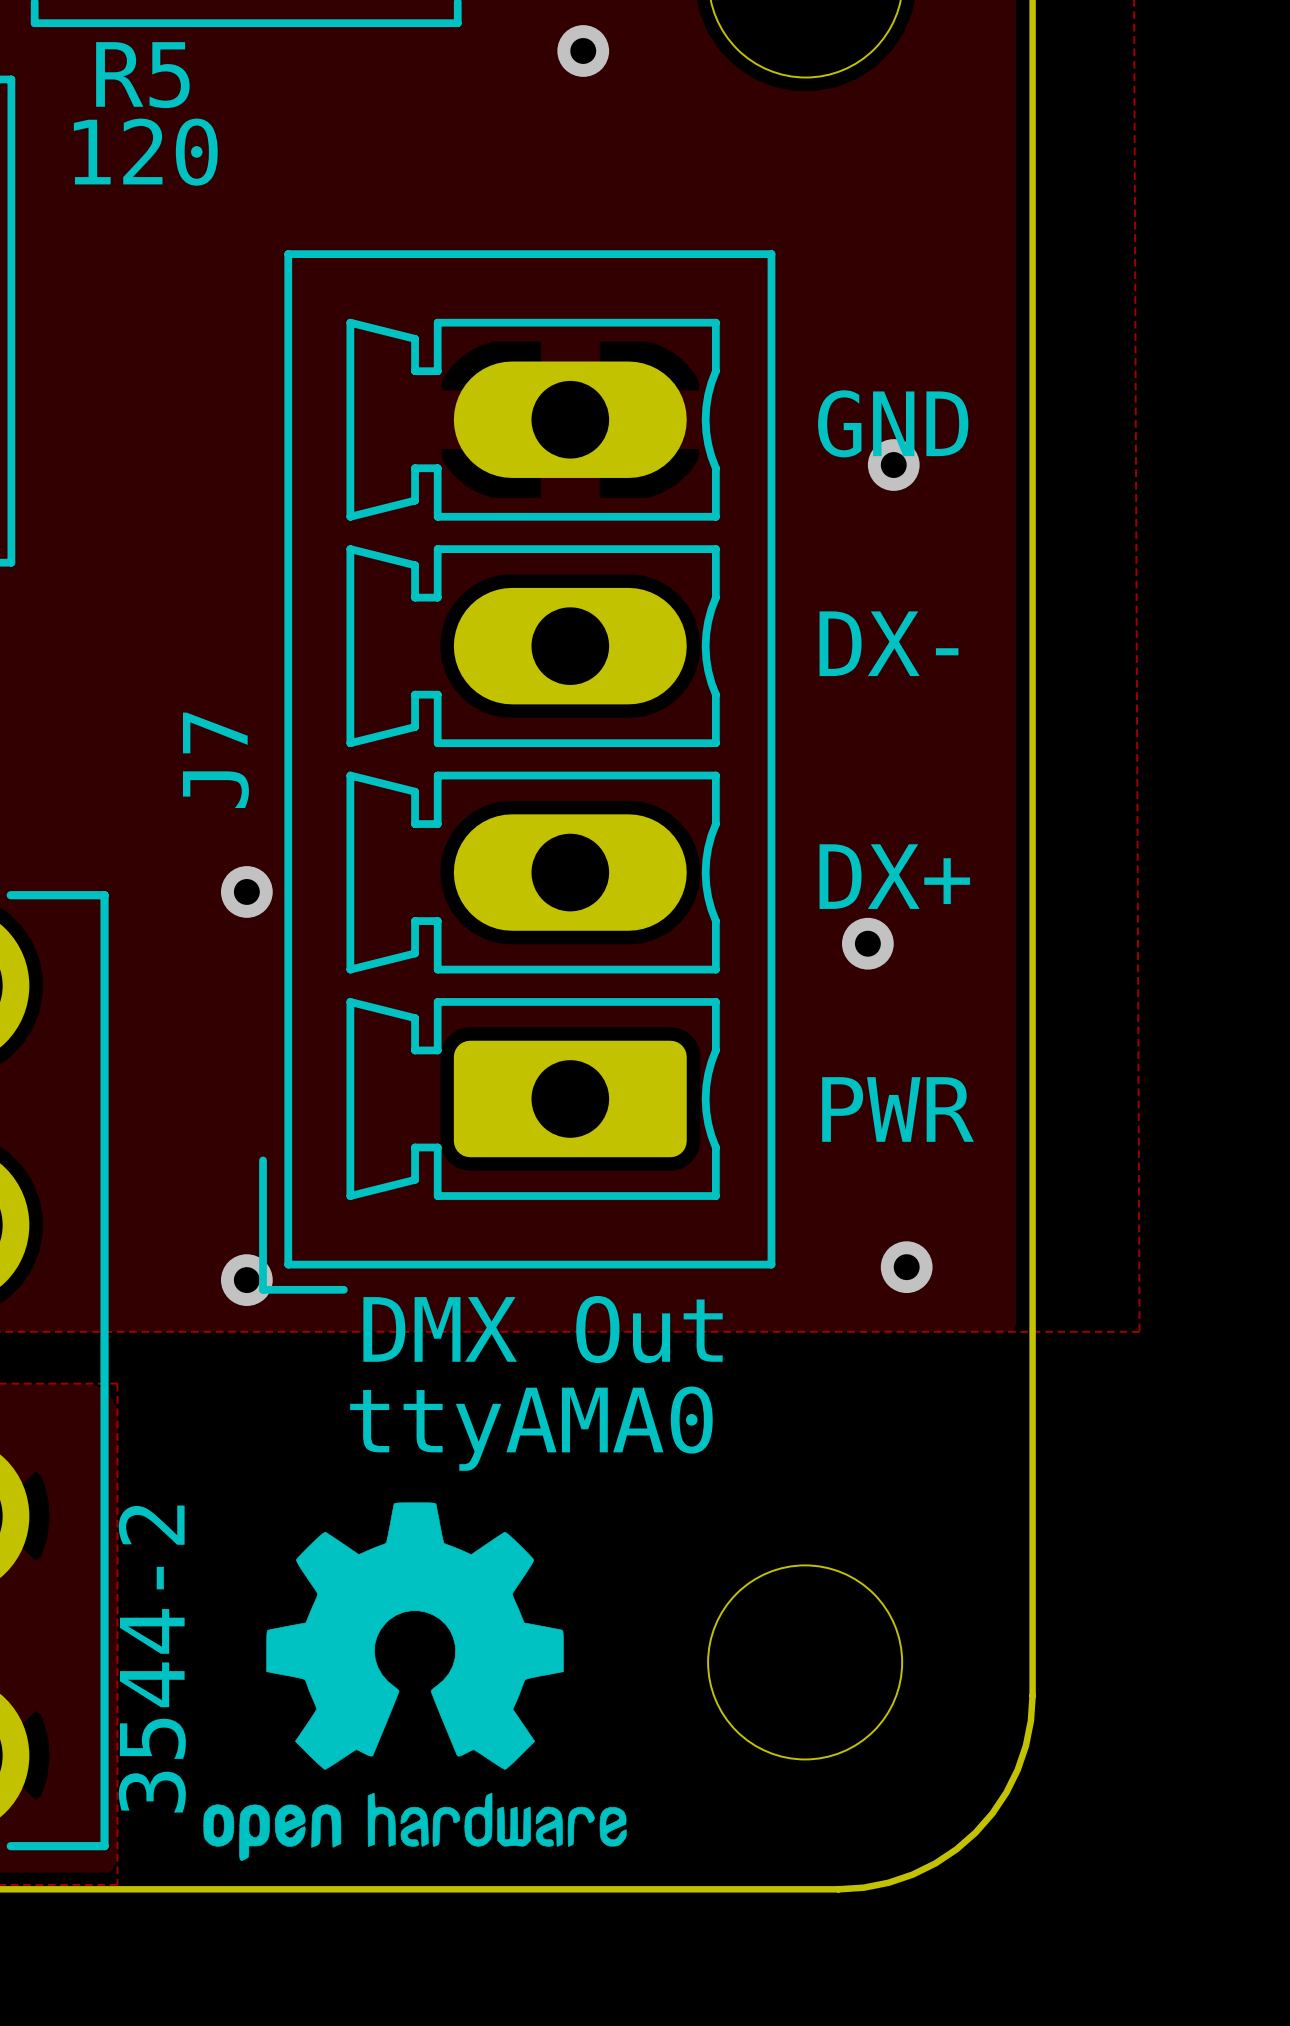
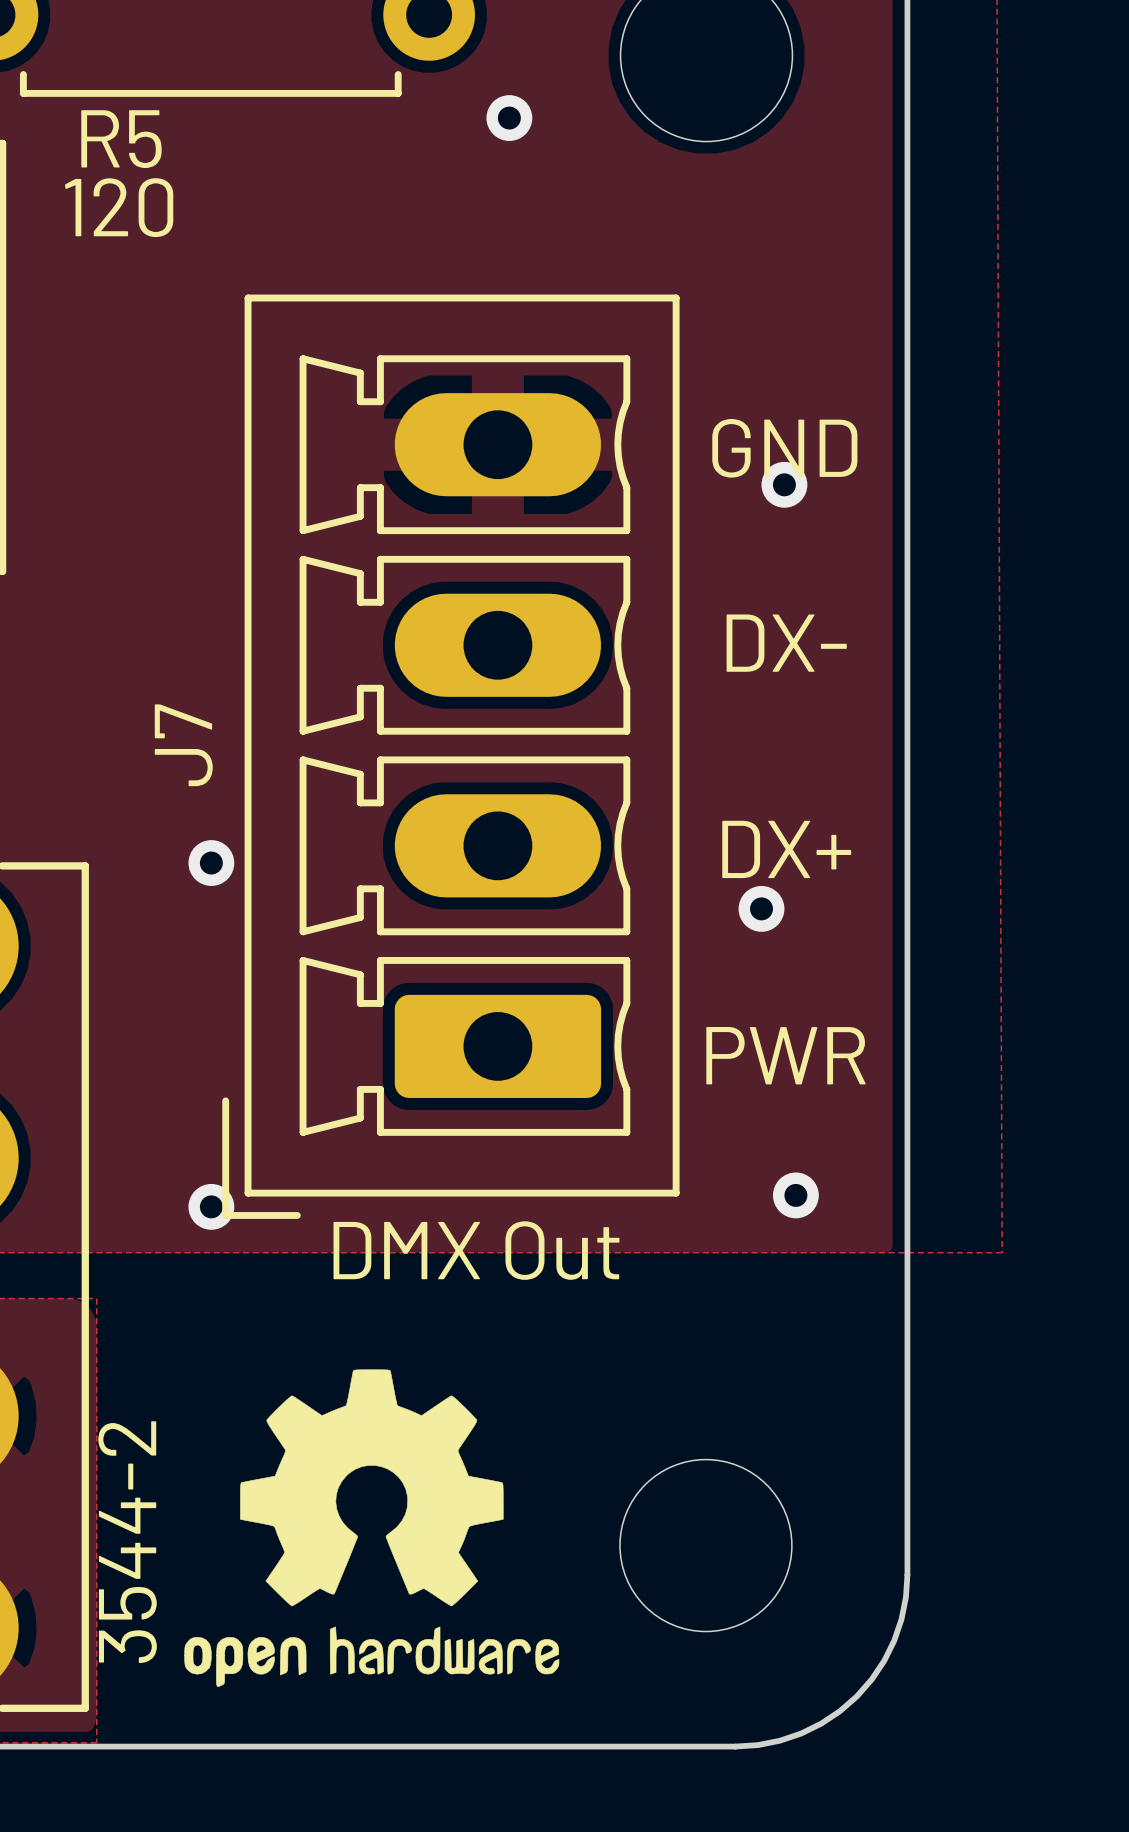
text: ttyAMA0 (531, 1428) -> none
drawing position: (415, 1681) -> (371, 1528)

